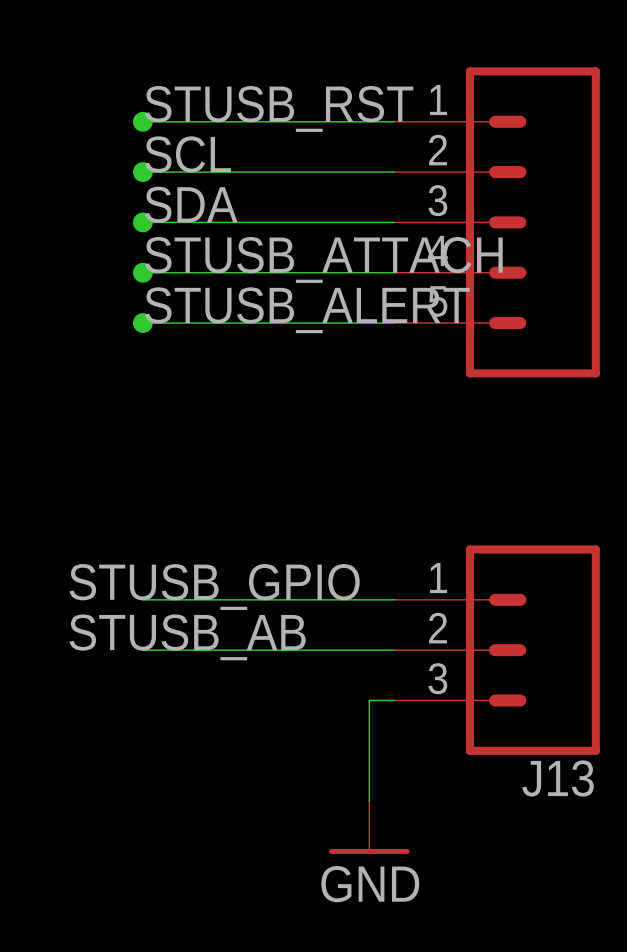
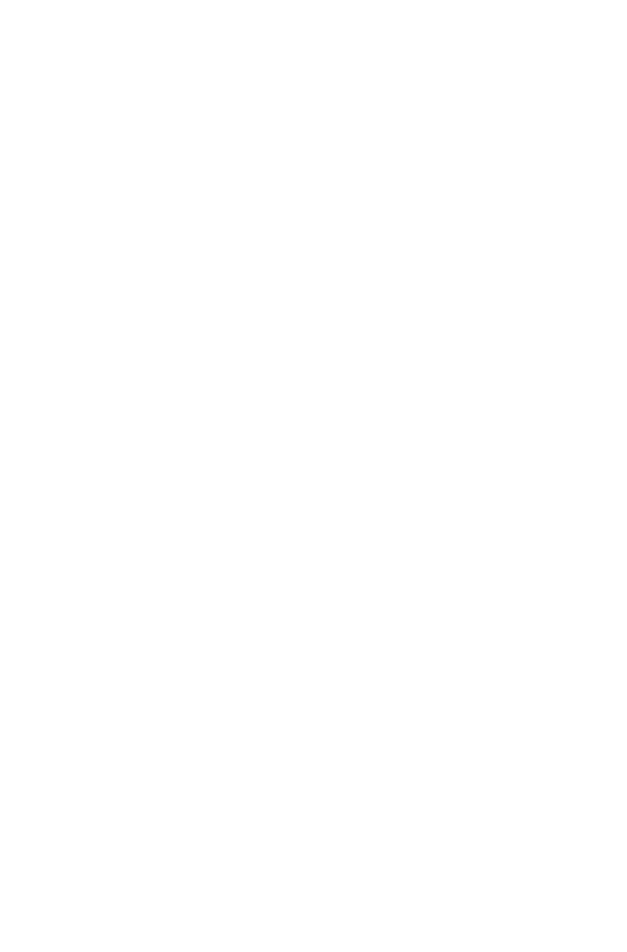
label: STUSB_RST (279, 108) -> none
wire: (142, 121) (394, 121) -> none
junction: (142, 121) -> none
label: SCL (188, 154) -> none
wire: (142, 172) (394, 172) -> none
junction: (142, 172) -> none
label: SDA (191, 204) -> none
wire: (142, 222) (394, 222) -> none
junction: (142, 222) -> none
part: (497, 222) -> none
label: STUSB_ATTACH (323, 259) -> none
wire: (142, 272) (394, 272) -> none
junction: (142, 272) -> none
label: STUSB_ALERT (307, 310) -> none
wire: (142, 323) (394, 323) -> none
junction: (142, 323) -> none
label: STUSB_GPIO (214, 587) -> none
wire: (142, 599) (394, 599) -> none
label: STUSB_AB (187, 637) -> none
wire: (142, 650) (394, 650) -> none
J13: (497, 650) -> none
wire: (394, 700) (369, 700) (369, 801) -> none
power symbol: GND (369, 827) -> none

